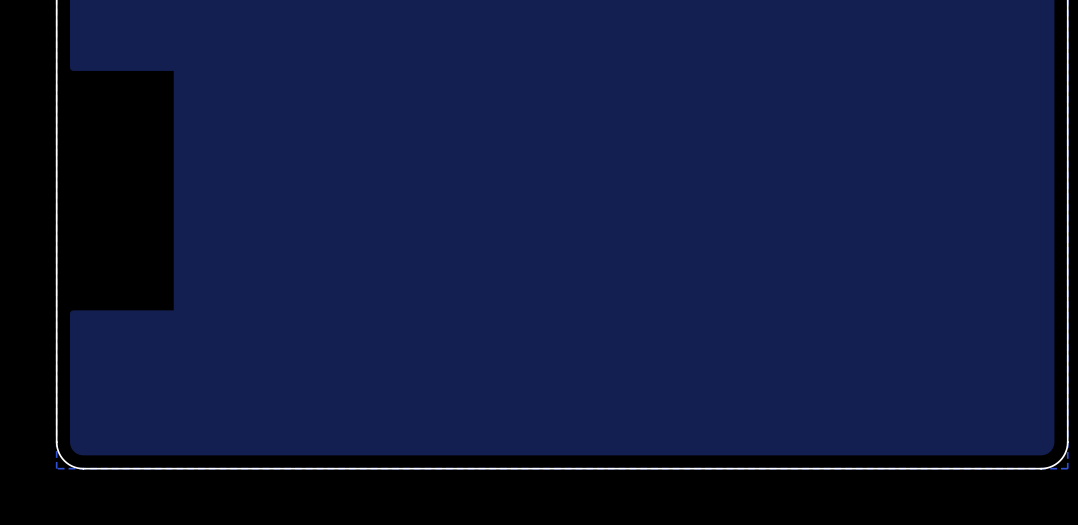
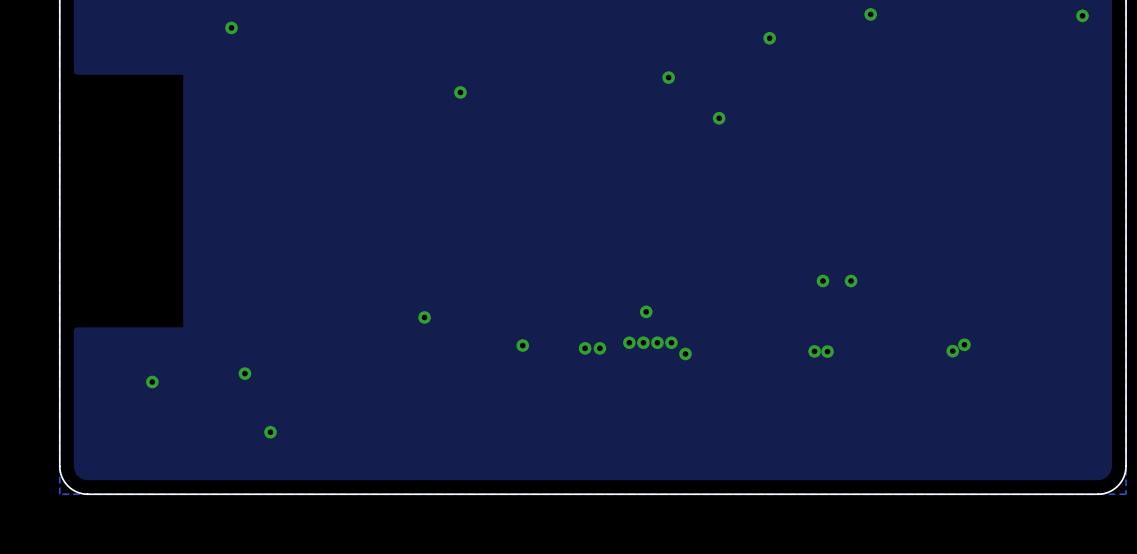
via: none -> (870, 14)
via: none -> (1082, 15)
via: none -> (231, 27)
via: none -> (769, 38)
via: none -> (668, 77)
via: none -> (460, 92)
via: none -> (719, 118)
via: none -> (822, 281)
via: none -> (851, 281)
via: none -> (646, 311)
via: none -> (424, 317)
via: none -> (629, 342)
via: none -> (643, 342)
via: none -> (657, 342)
via: none -> (671, 342)
via: none -> (964, 344)
via: none -> (522, 345)
via: none -> (585, 348)
via: none -> (599, 348)
via: none -> (952, 351)
via: none -> (814, 351)
via: none -> (827, 351)
via: none -> (685, 353)
via: none -> (244, 373)
via: none -> (152, 382)
via: none -> (270, 432)

